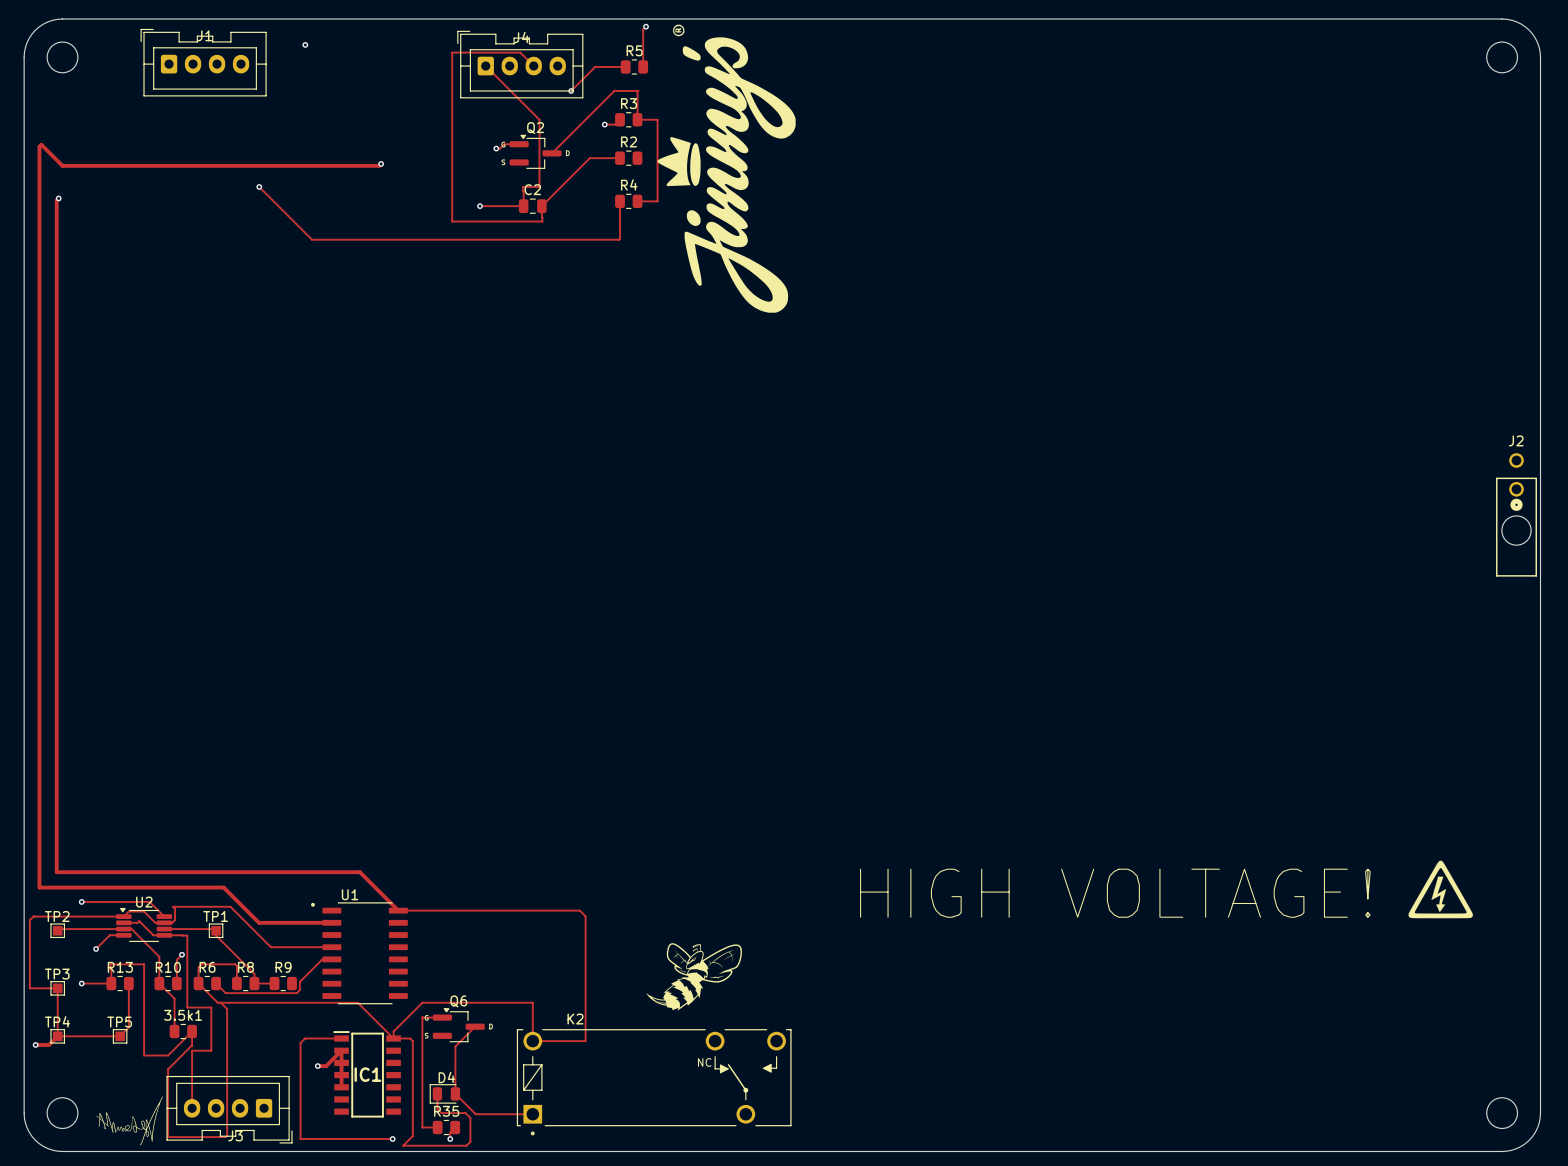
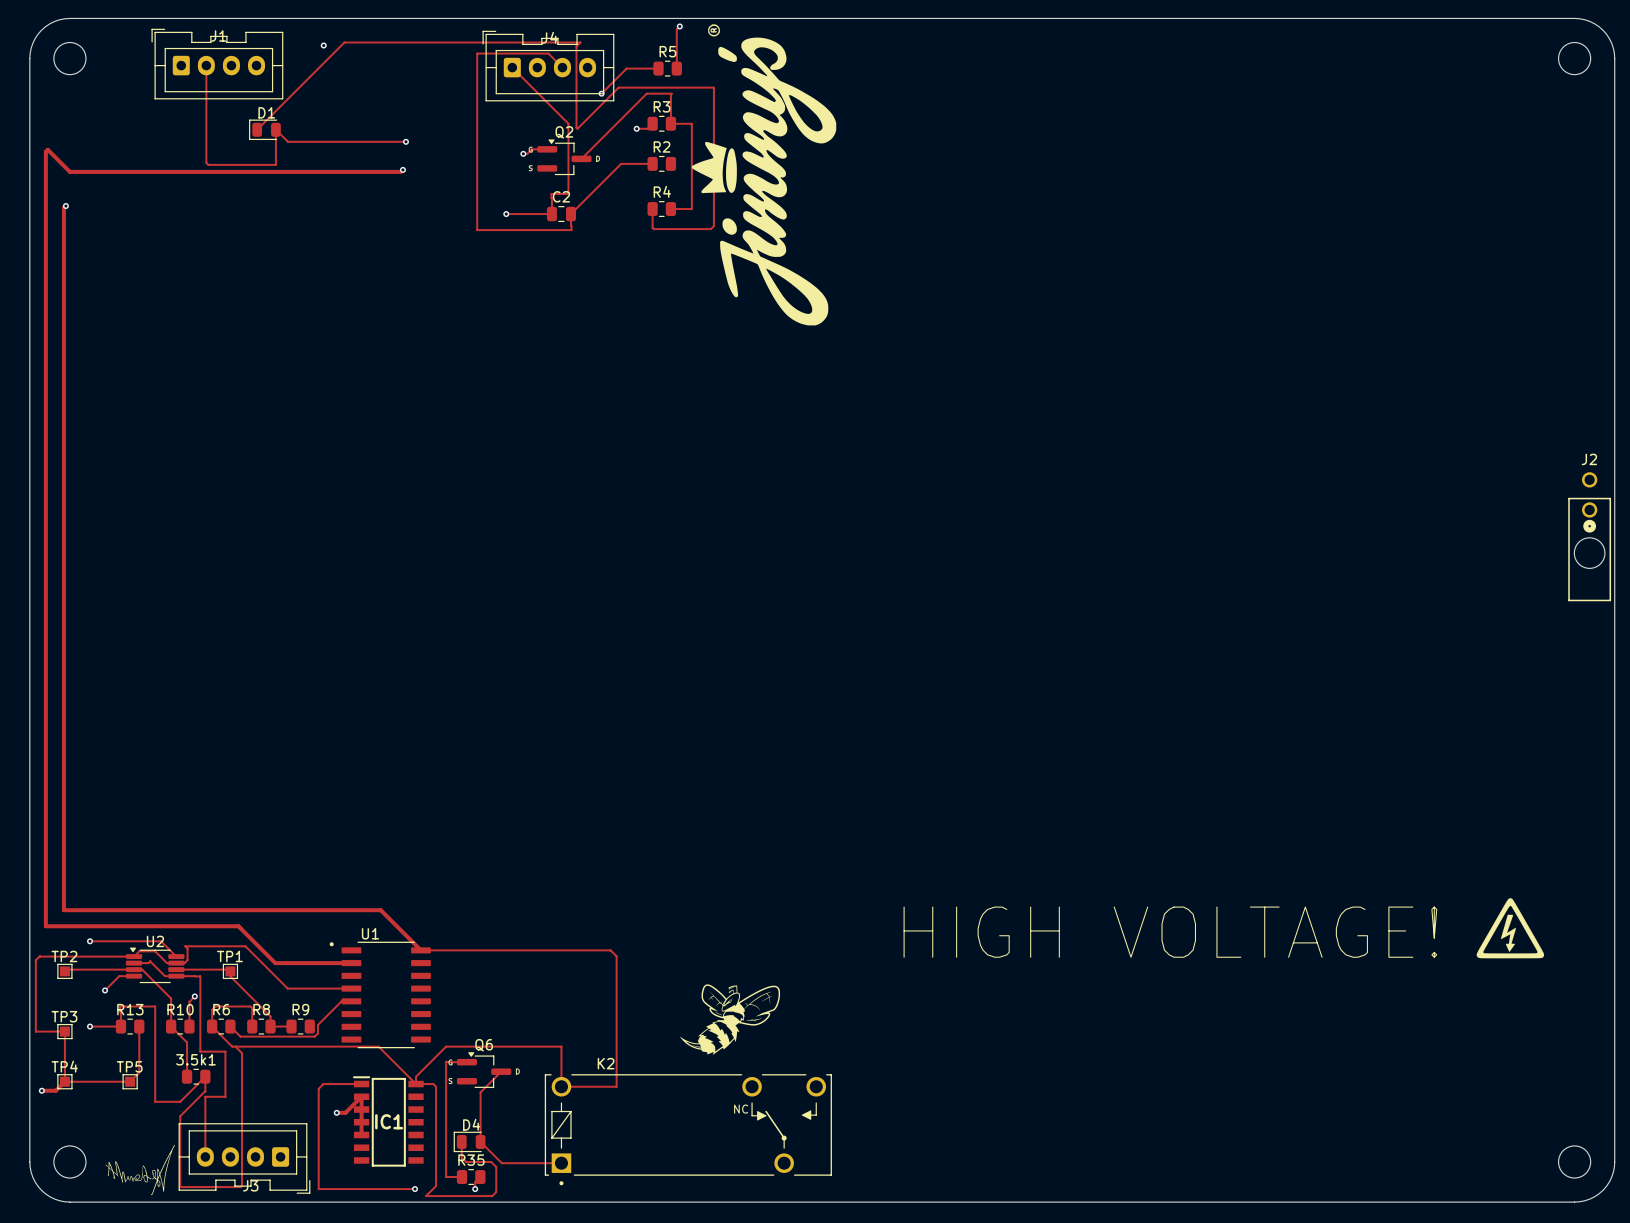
track: none -> (206, 65) (206, 162) (208, 164) (275, 164) (275, 129) (287, 141) (405, 141)
D1: none -> (264, 129)
via: none -> (405, 141)
track: (259, 186) (312, 239) (619, 239) (620, 219) -> (257, 129) (344, 42) (580, 42) (576, 46) (577, 128) (618, 87) (713, 87) (713, 226) (710, 229) (652, 227)
via: (259, 186) -> none

